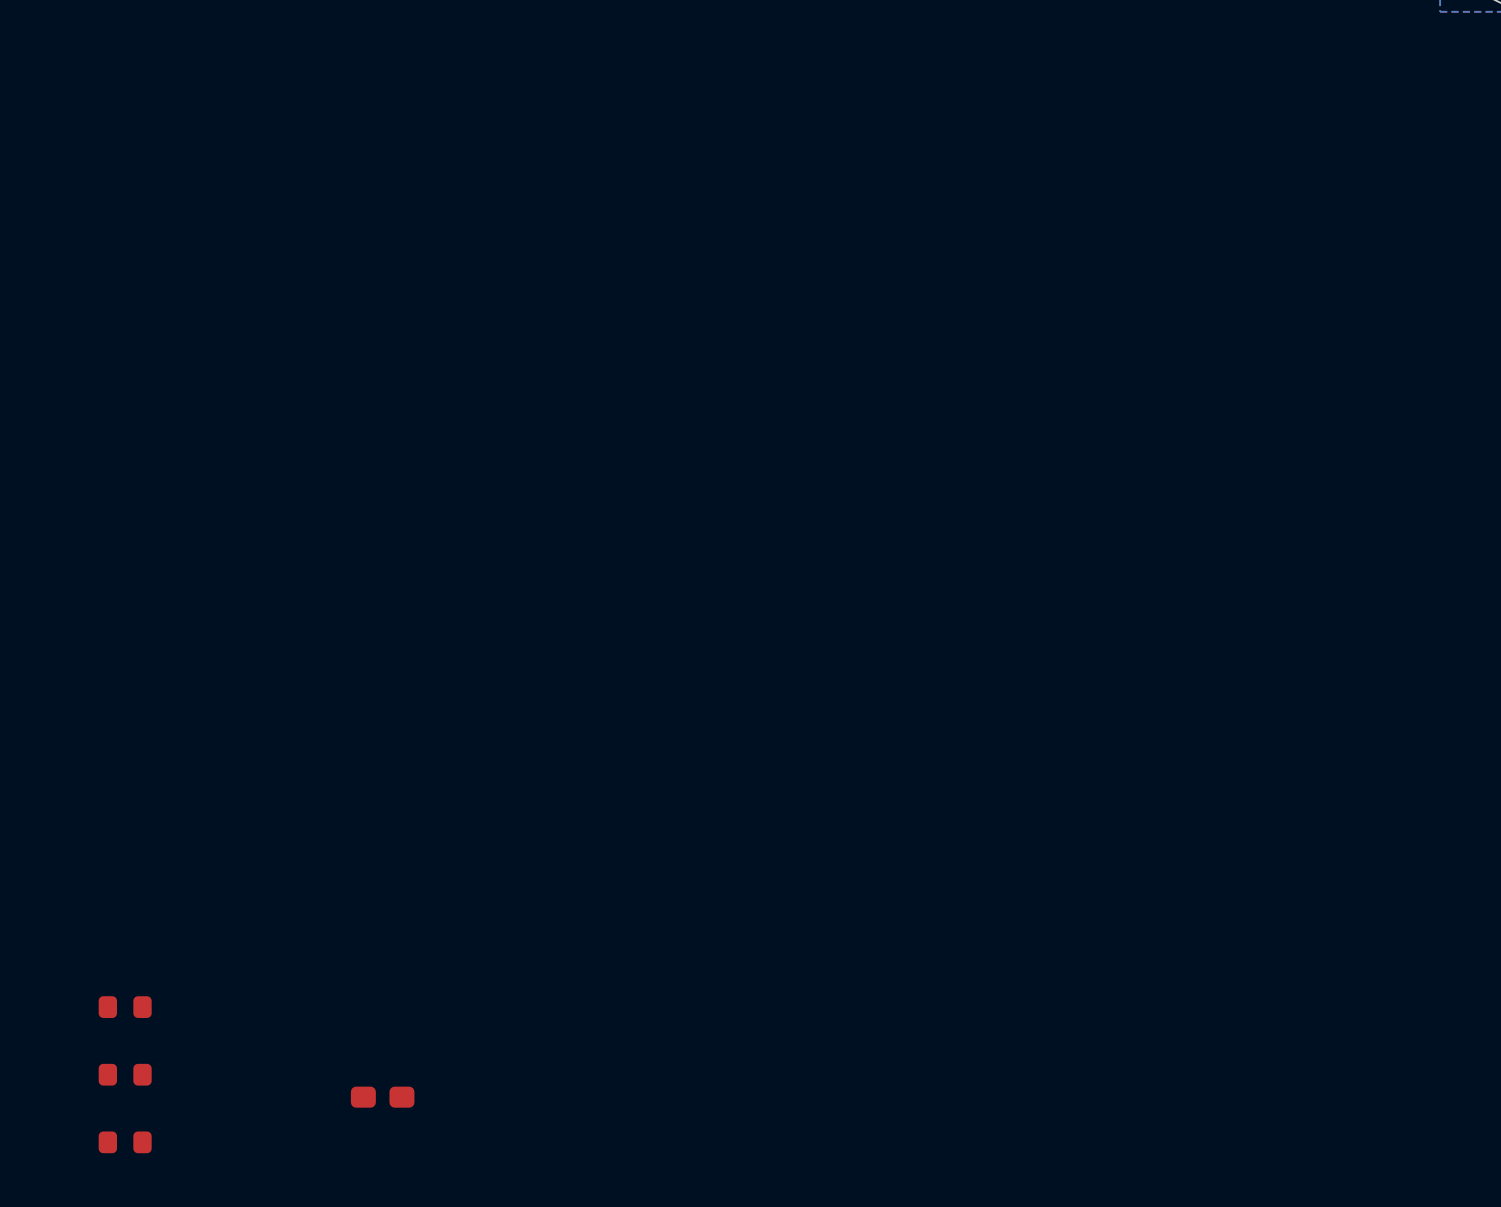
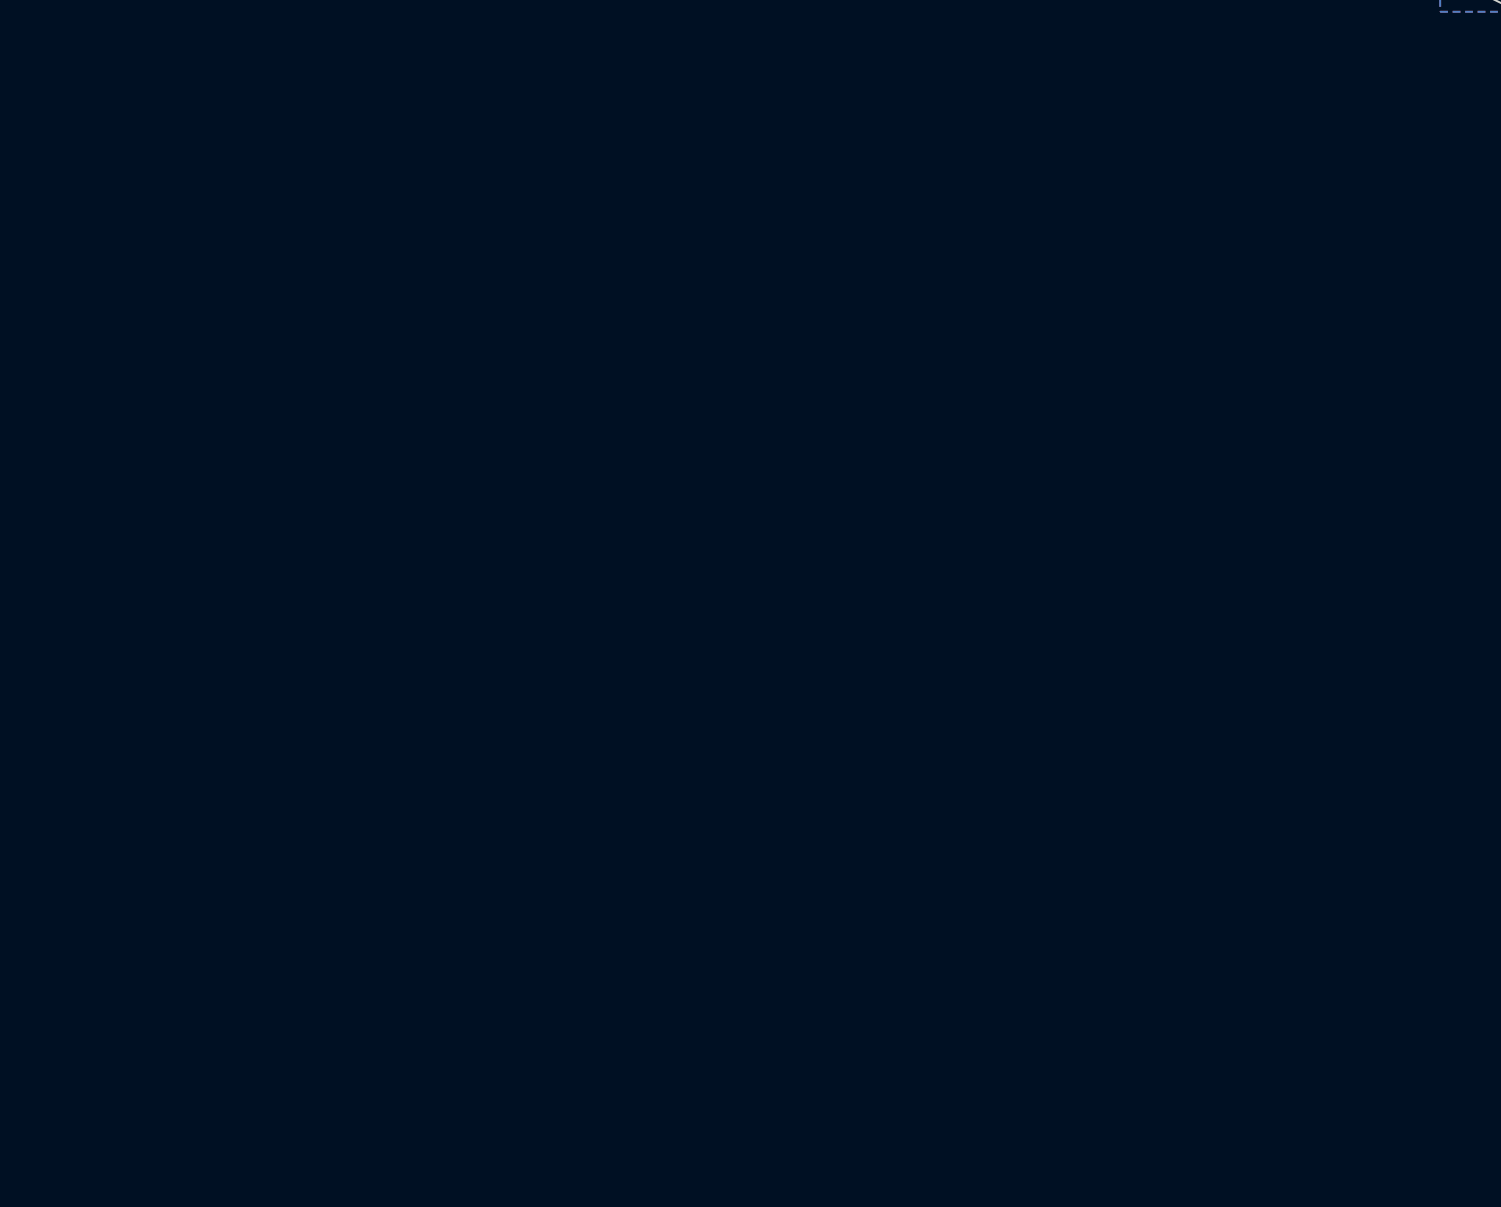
part: (125, 1007) -> none
part: (125, 1074) -> none
part: (382, 1097) -> none
part: (125, 1142) -> none

